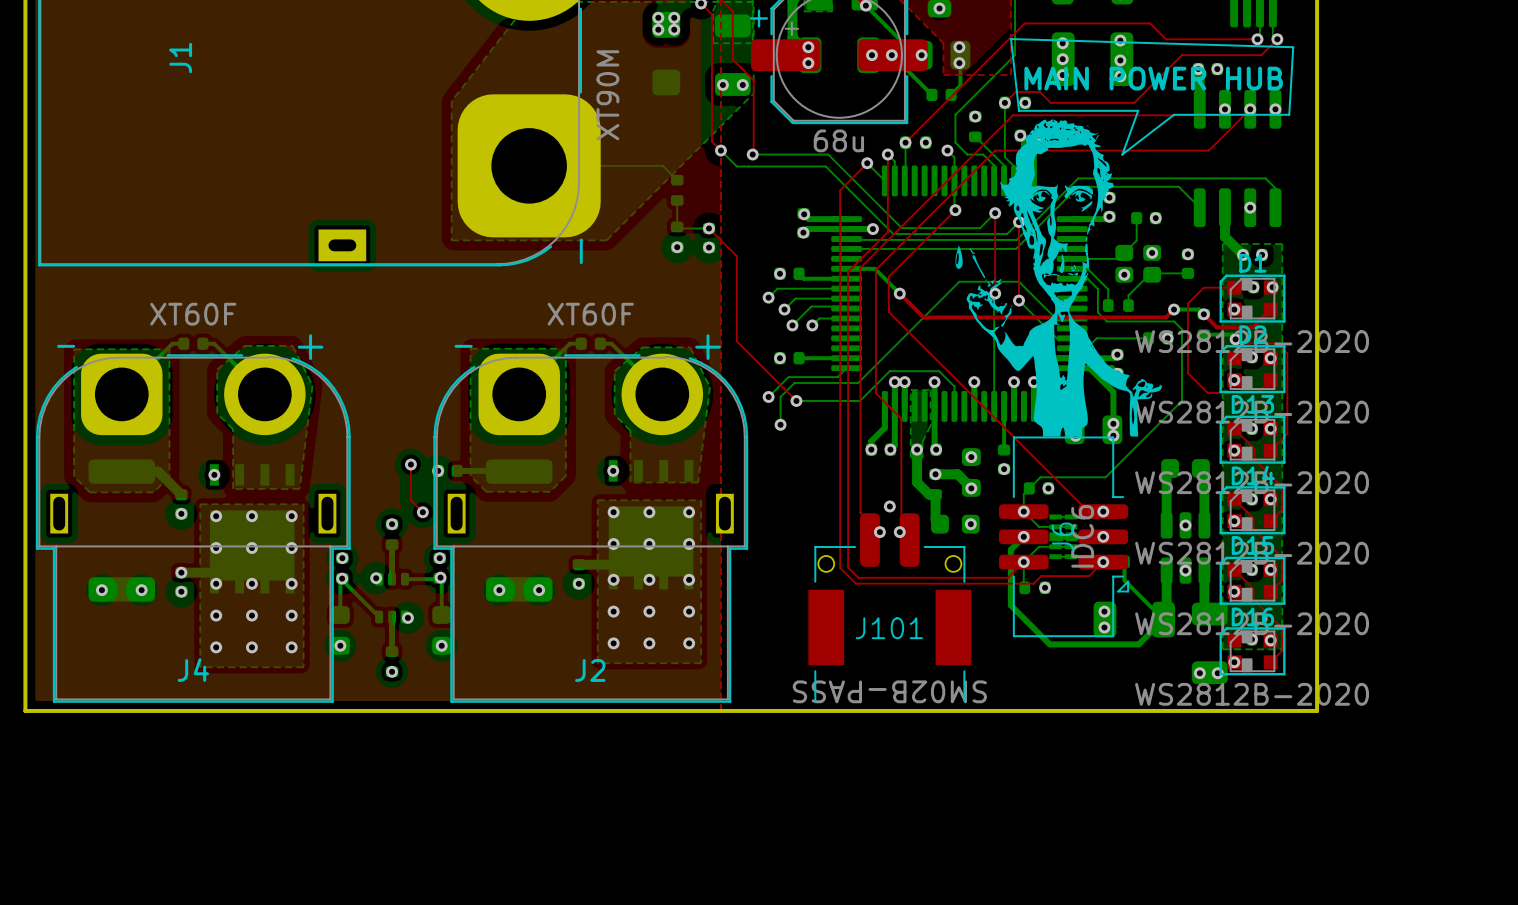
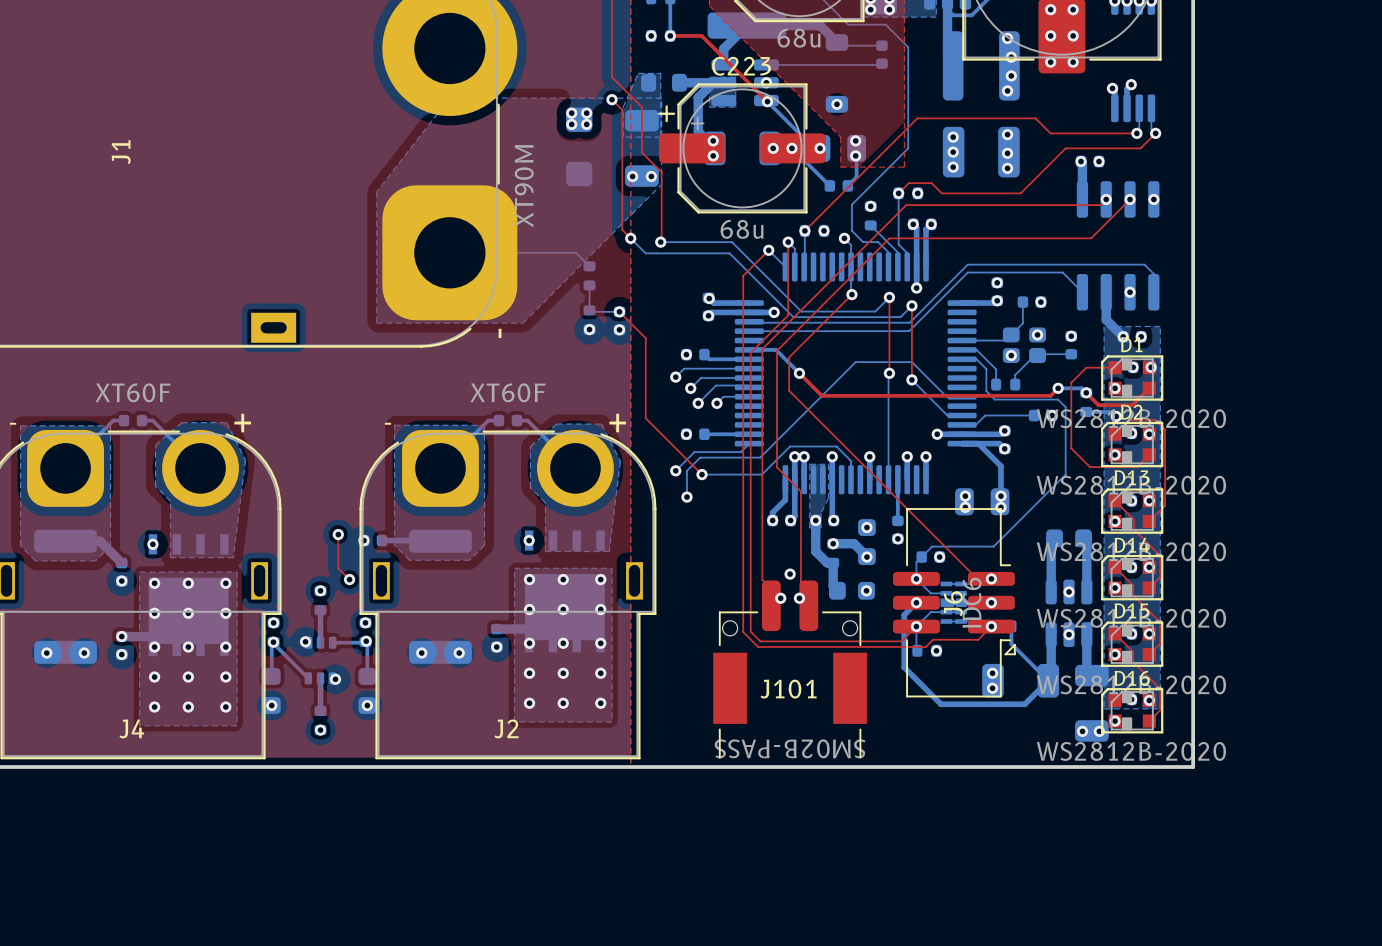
line: (1011, 39) (1019, 110) (1138, 110) (1122, 154) (1174, 114) (1289, 114) (1293, 47) (1011, 39) -> none
text: MAIN POWER HUB (1153, 78) -> none
drawing: [955, 118, 1163, 437] -> none

